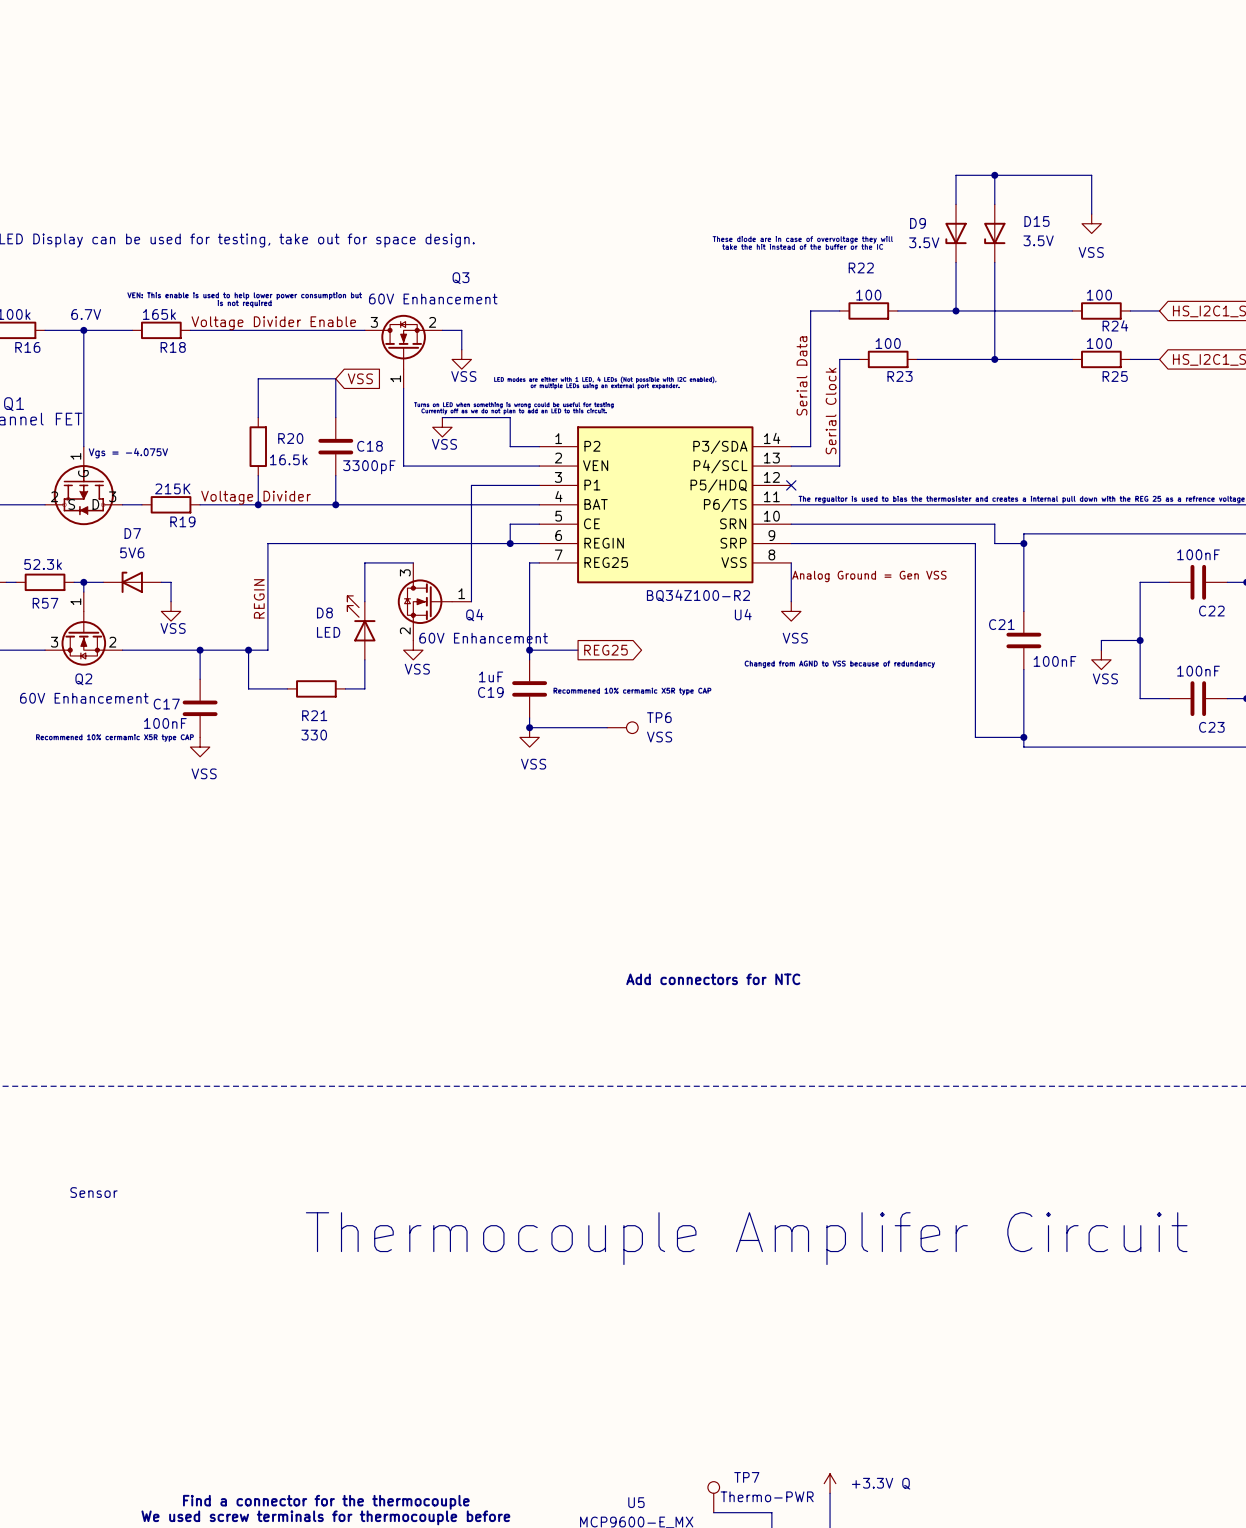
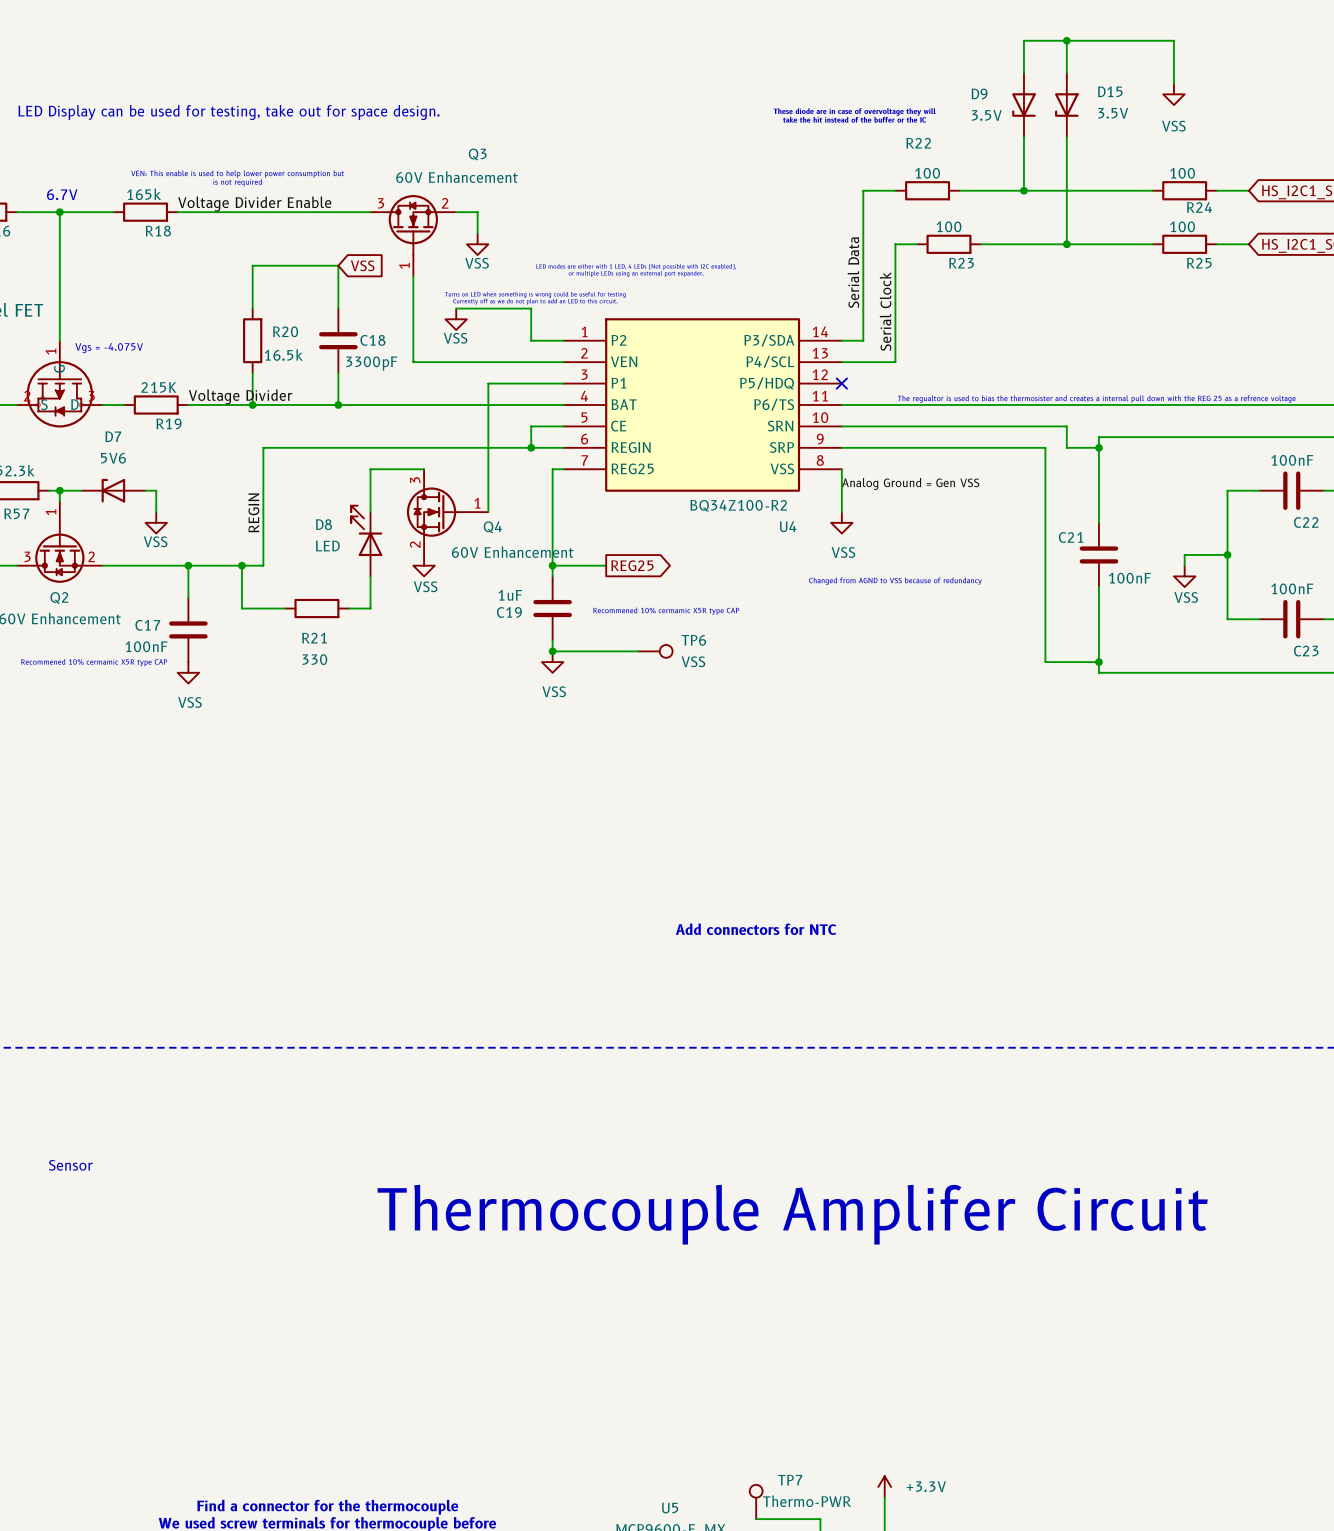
power symbol: +3.3V Q (830, 1483) -> +3.3V (884, 1486)

